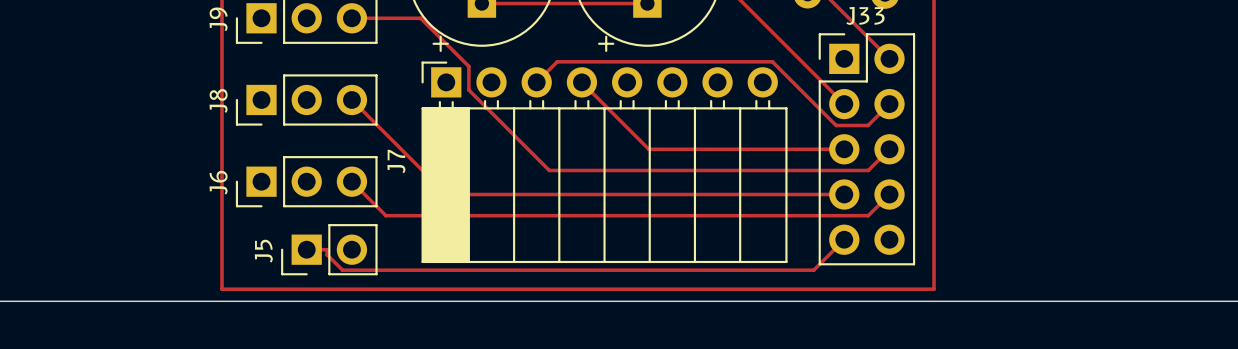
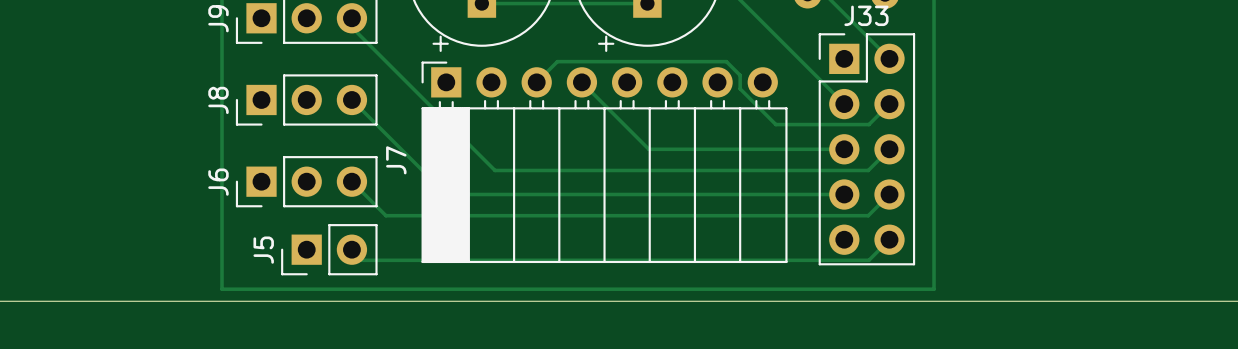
track: (351, 18) (420, 18) (468, 66) (468, 90) (549, 170) -> (351, 18) (351, 27) (495, 170) (549, 170)
track: (557, 61) (772, 61) (836, 125) (869, 124) -> (557, 61) (726, 61) (740, 75) (740, 88) (775, 124) (869, 124)
track: (844, 239) (813, 270) (342, 270) (327, 254) (327, 249) (306, 249) -> none
track: none -> (889, 239) (868, 260) (362, 260) (351, 249)

